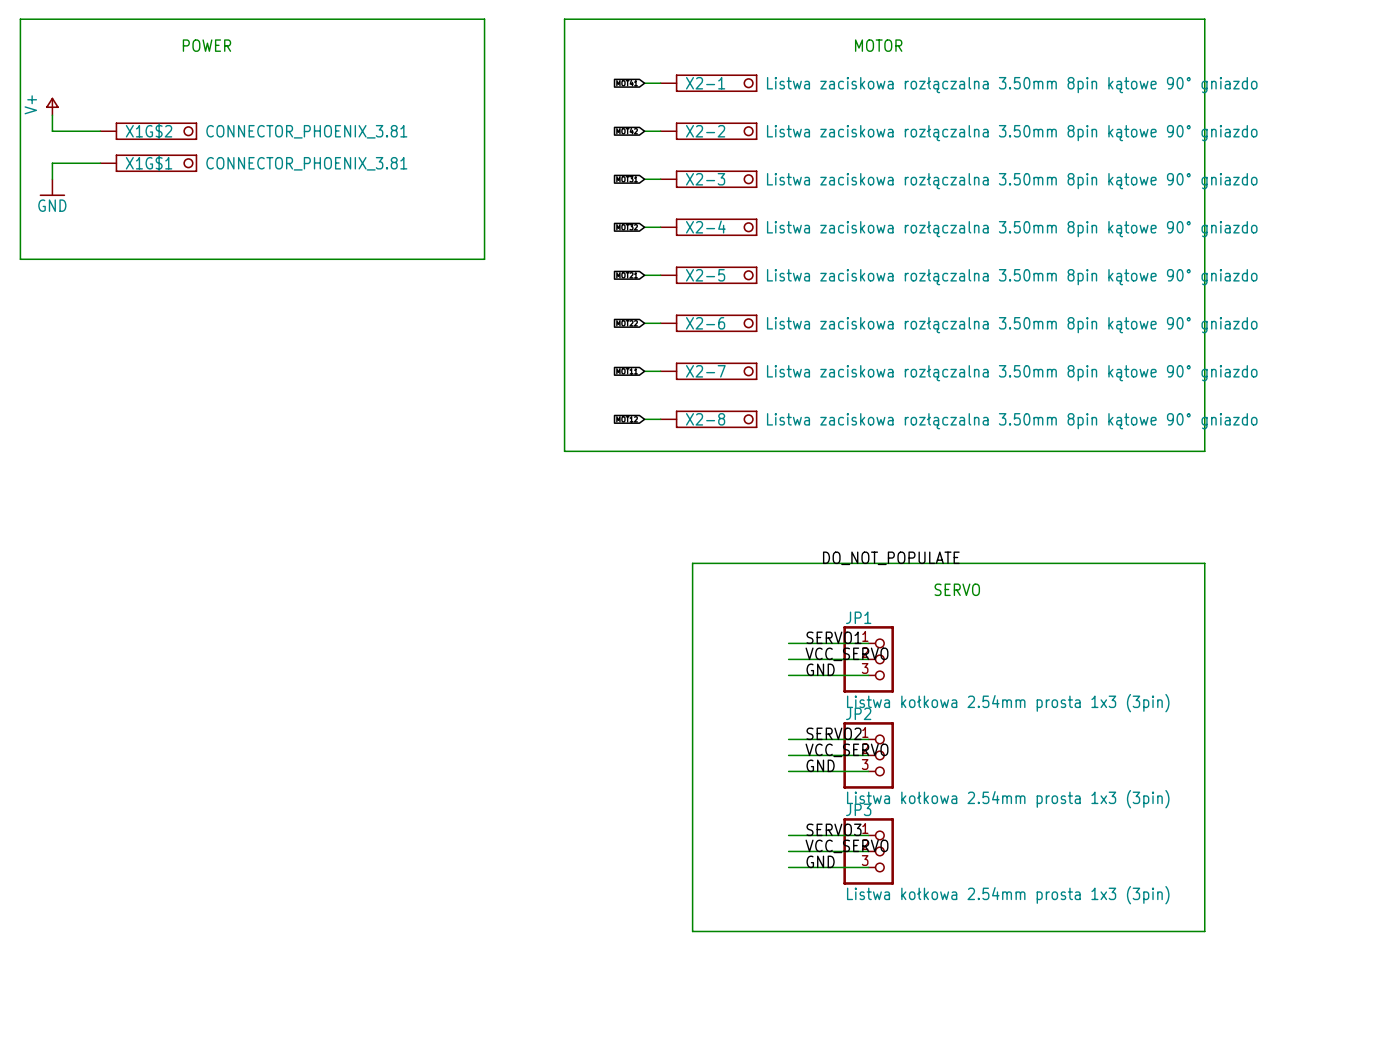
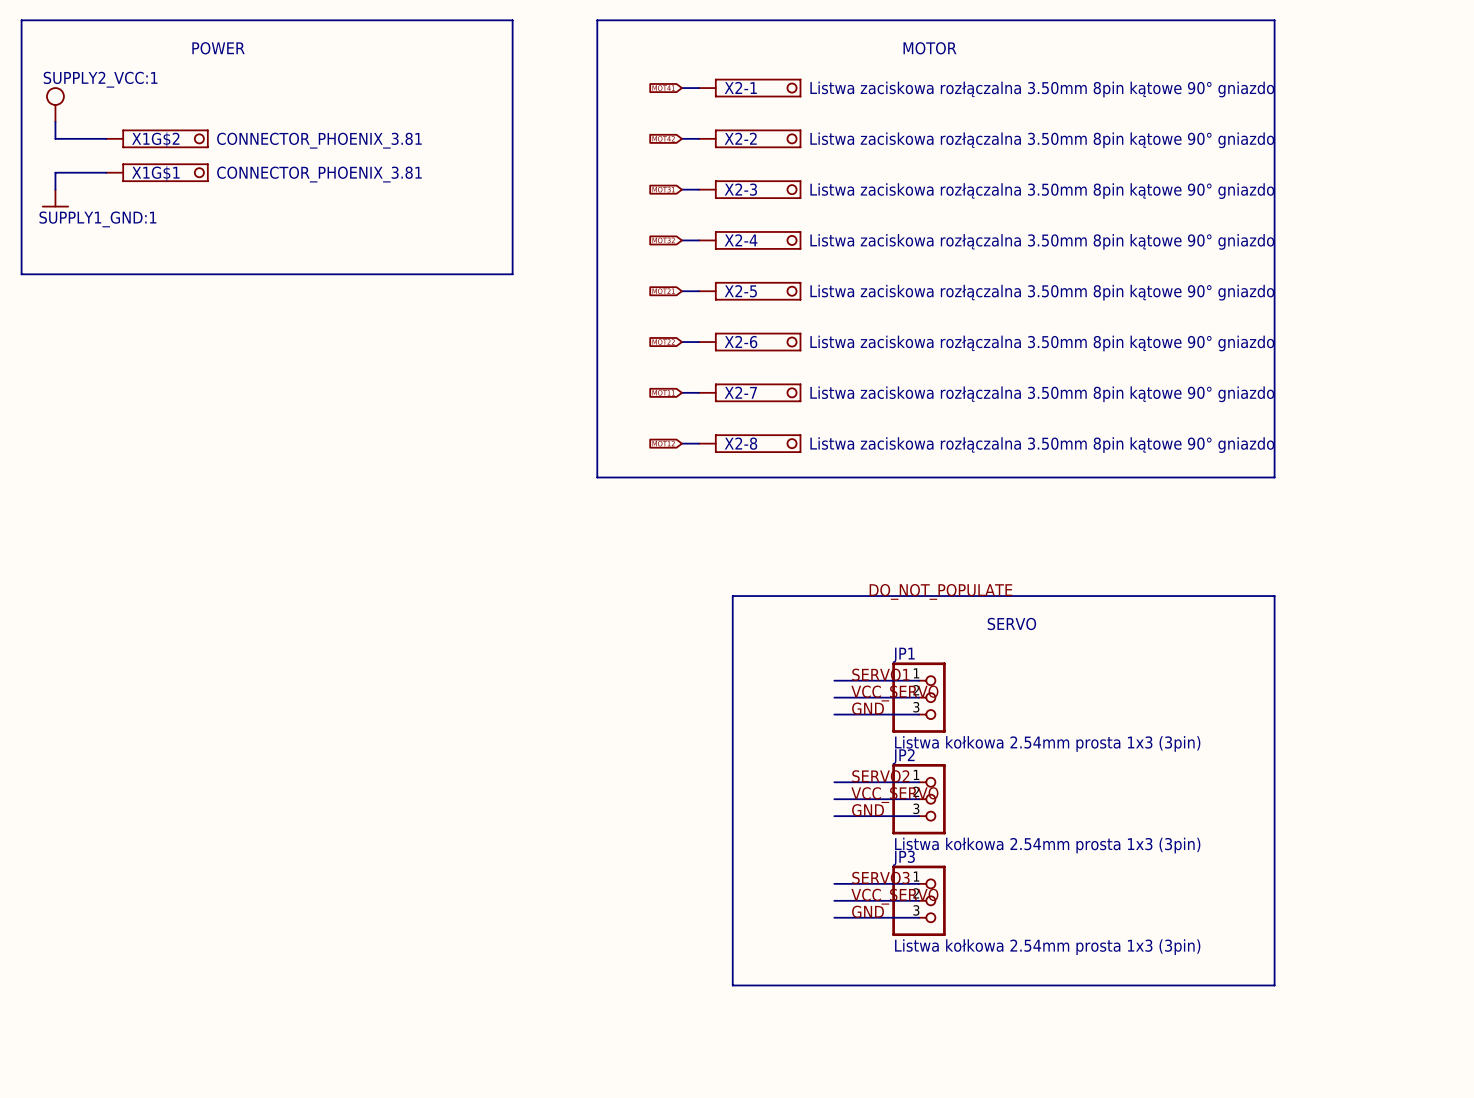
power symbol: none -> SUPPLY2_VCC:1 (55, 104)
power symbol: V+ (52, 106) -> none
power symbol: GND (52, 187) -> SUPPLY1_GND:1 (55, 198)

